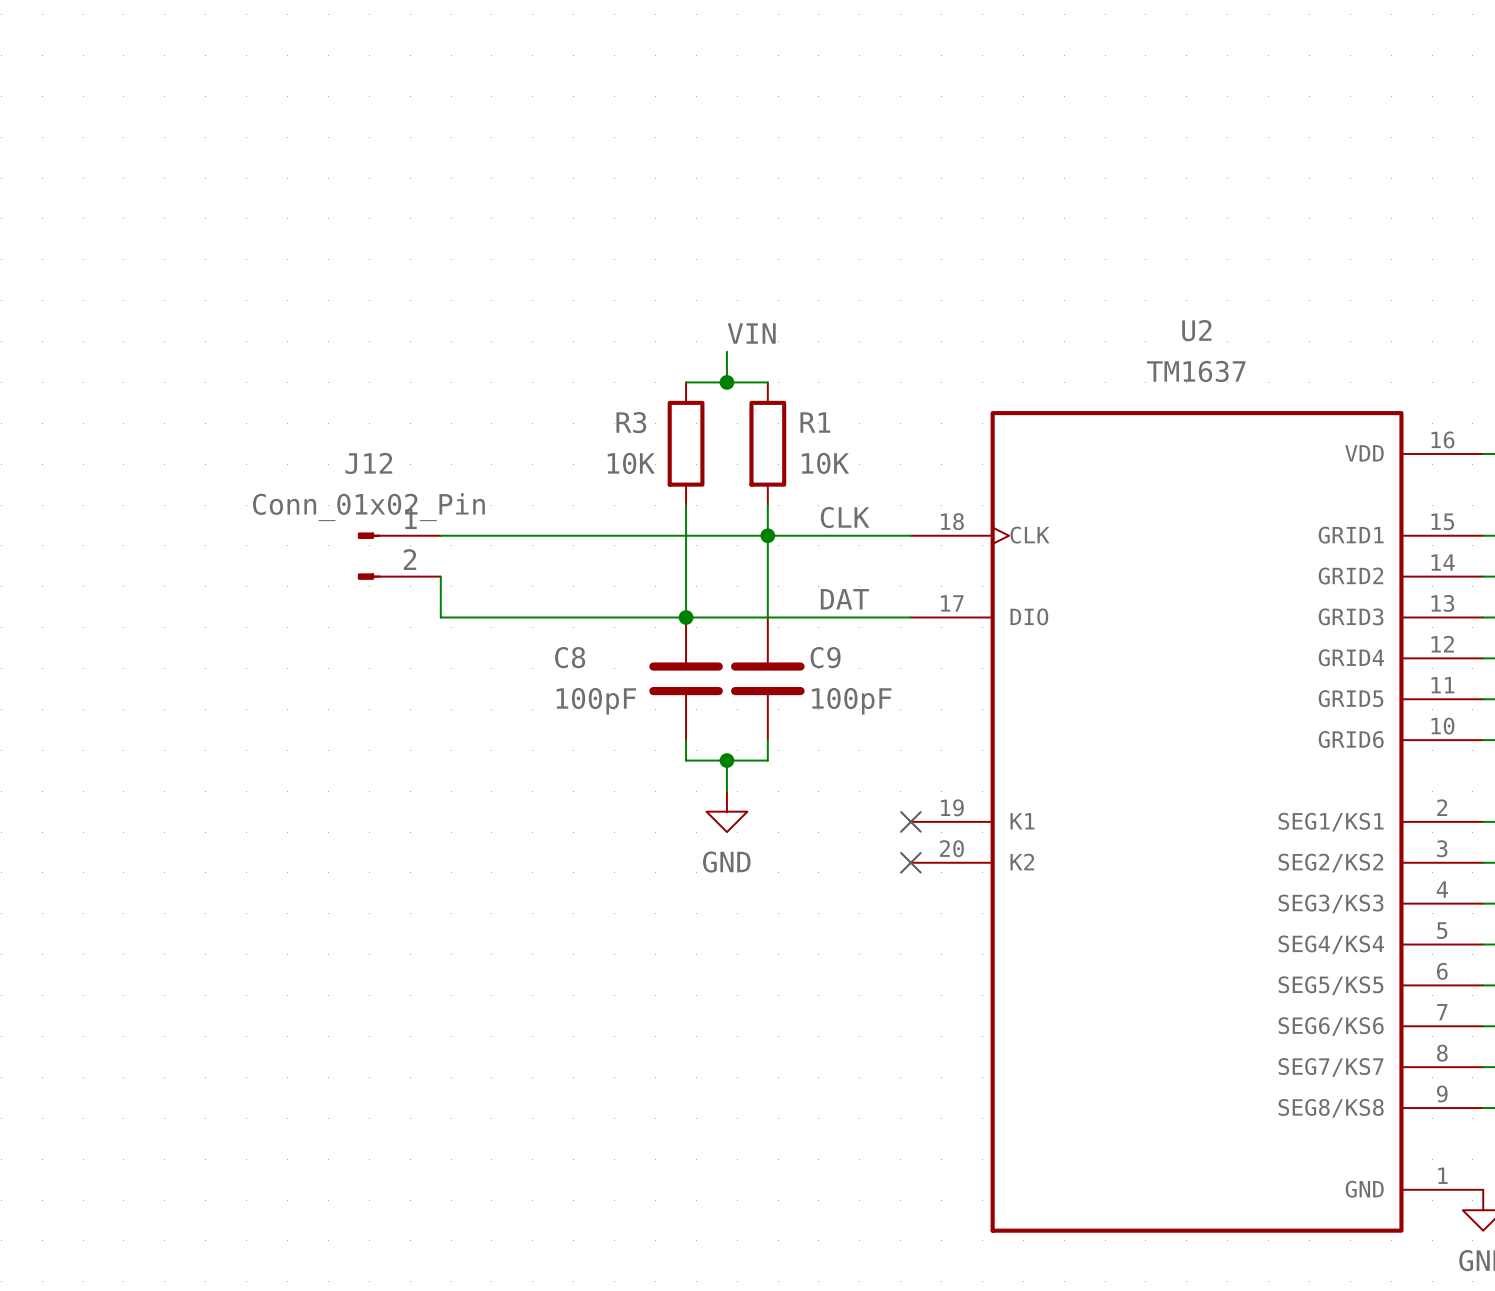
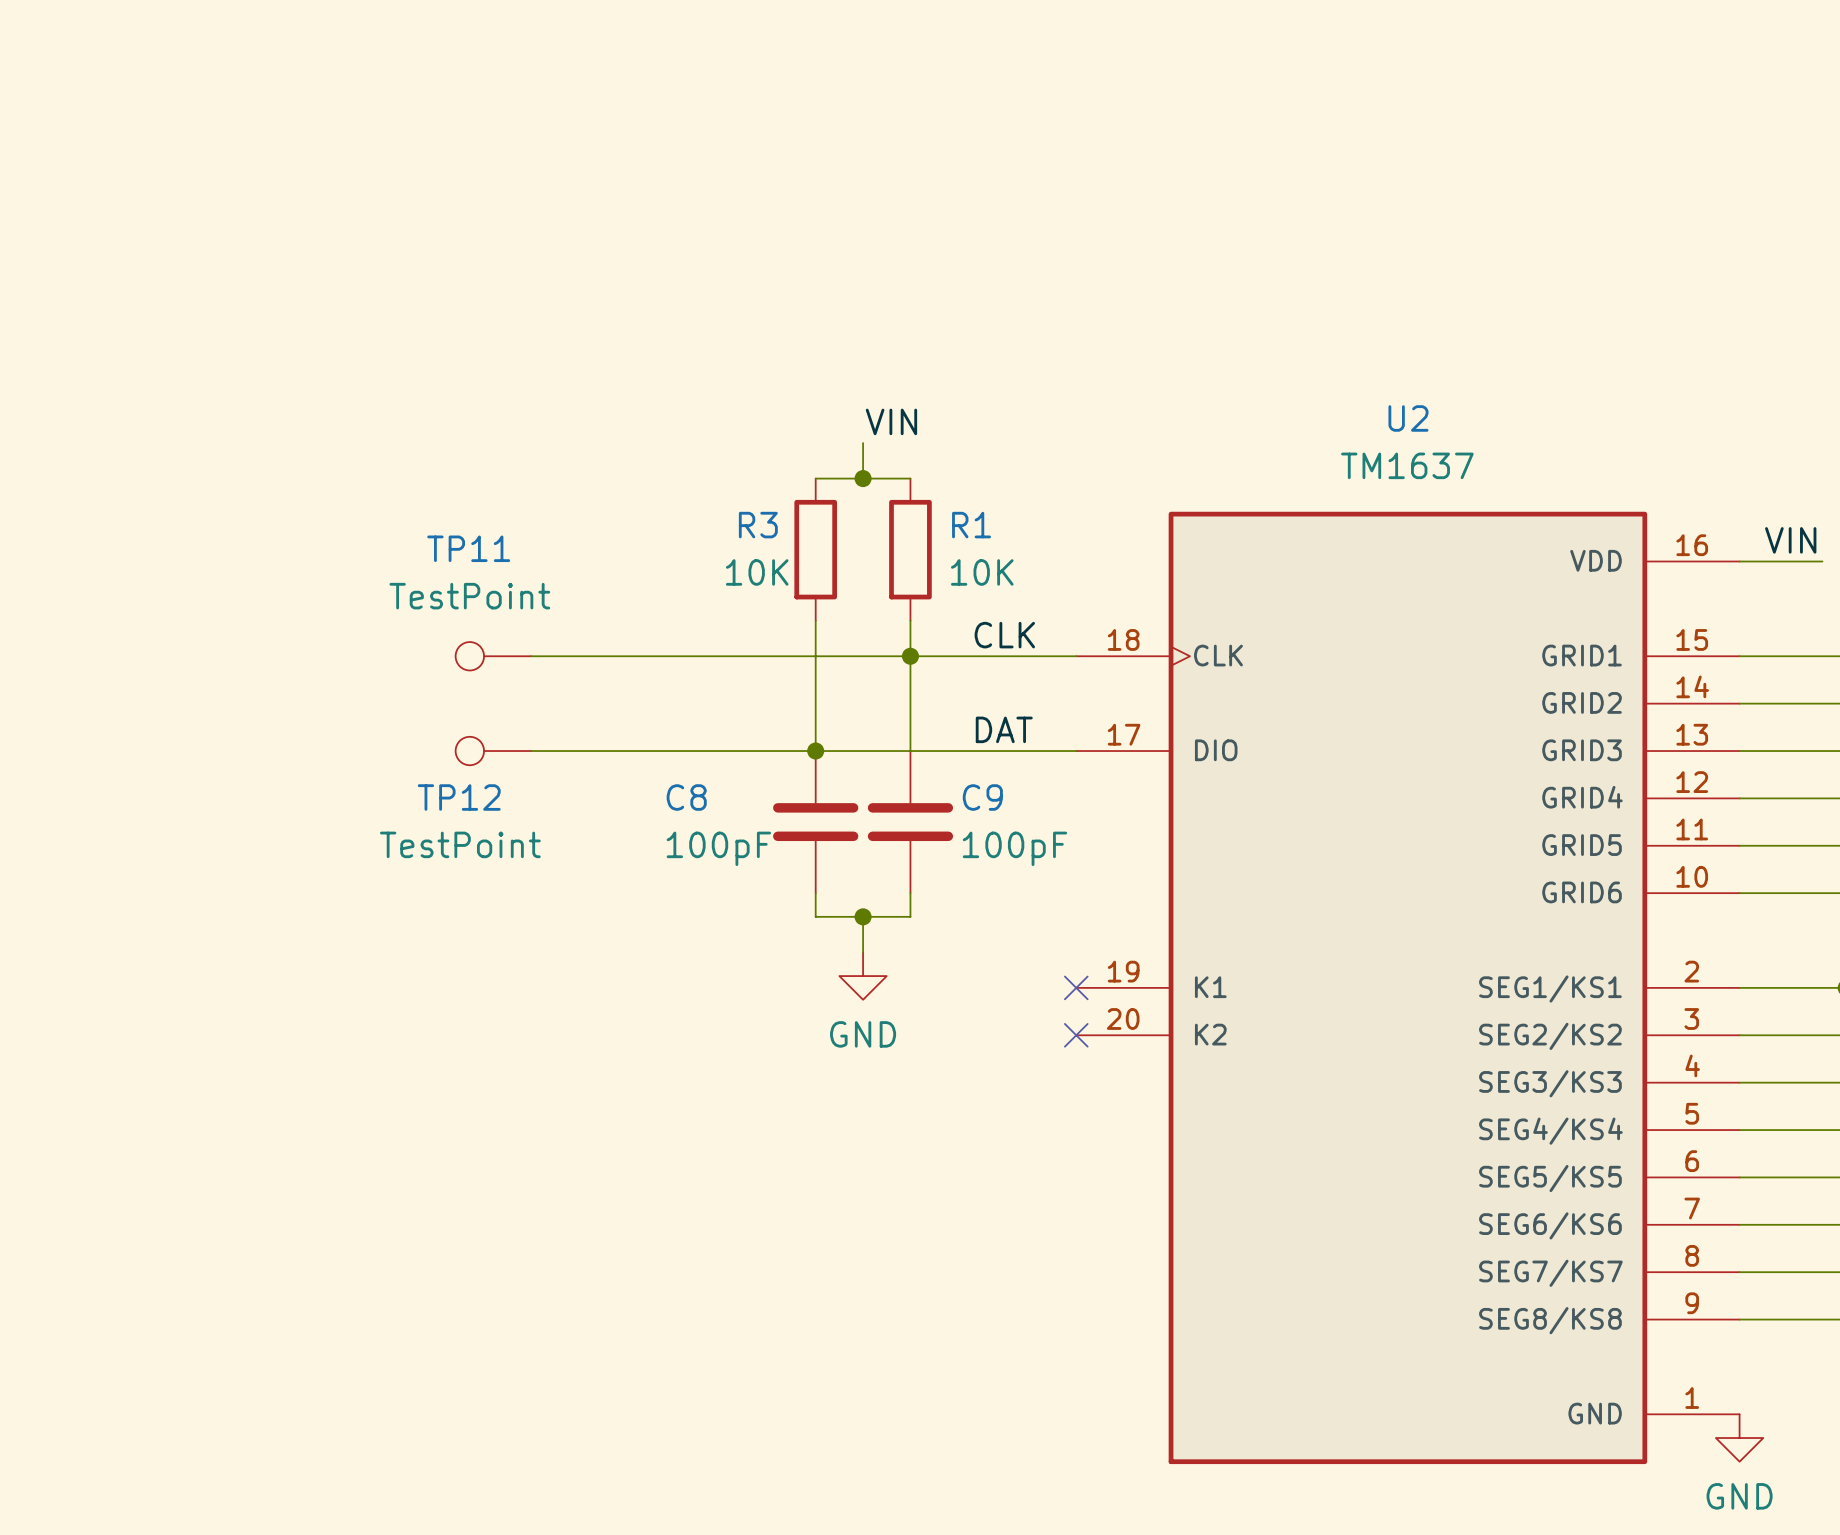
TP11: none -> TestPoint (493, 656)
J12: Conn_01x02_Pin (399, 556) -> none
wire: (440, 576) (440, 617) -> none
TP12: none -> TestPoint (493, 751)

